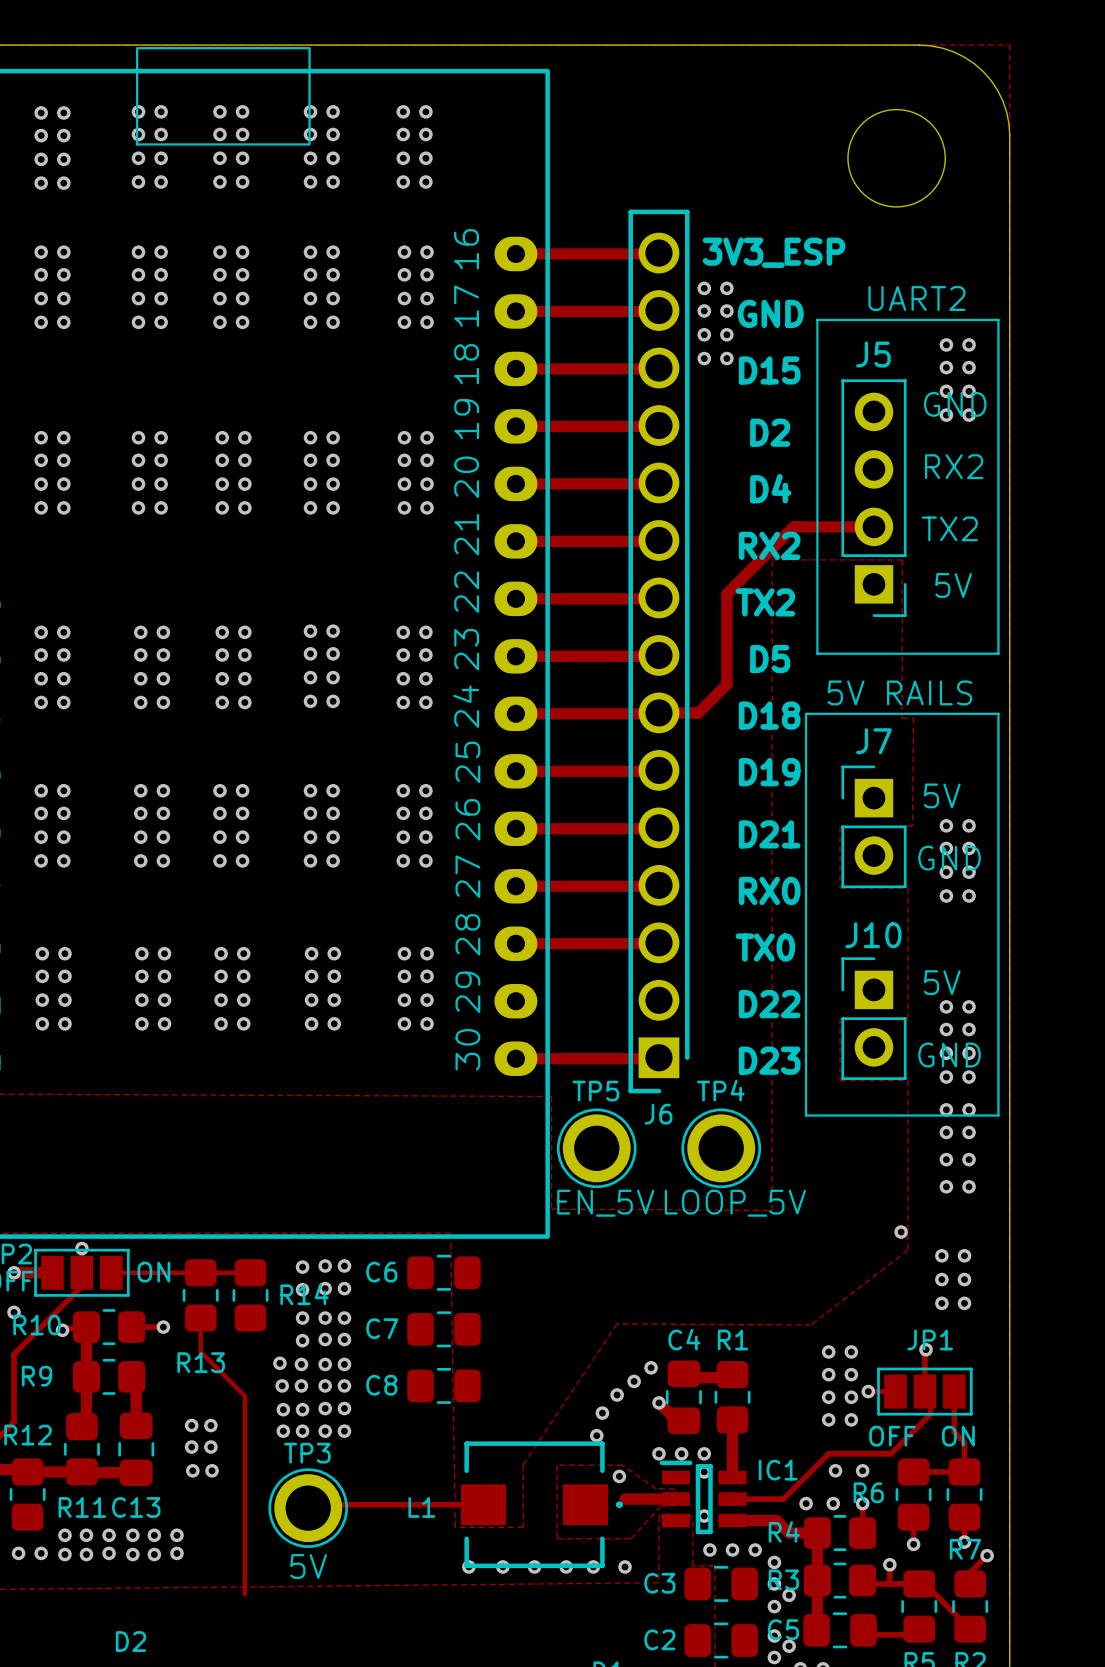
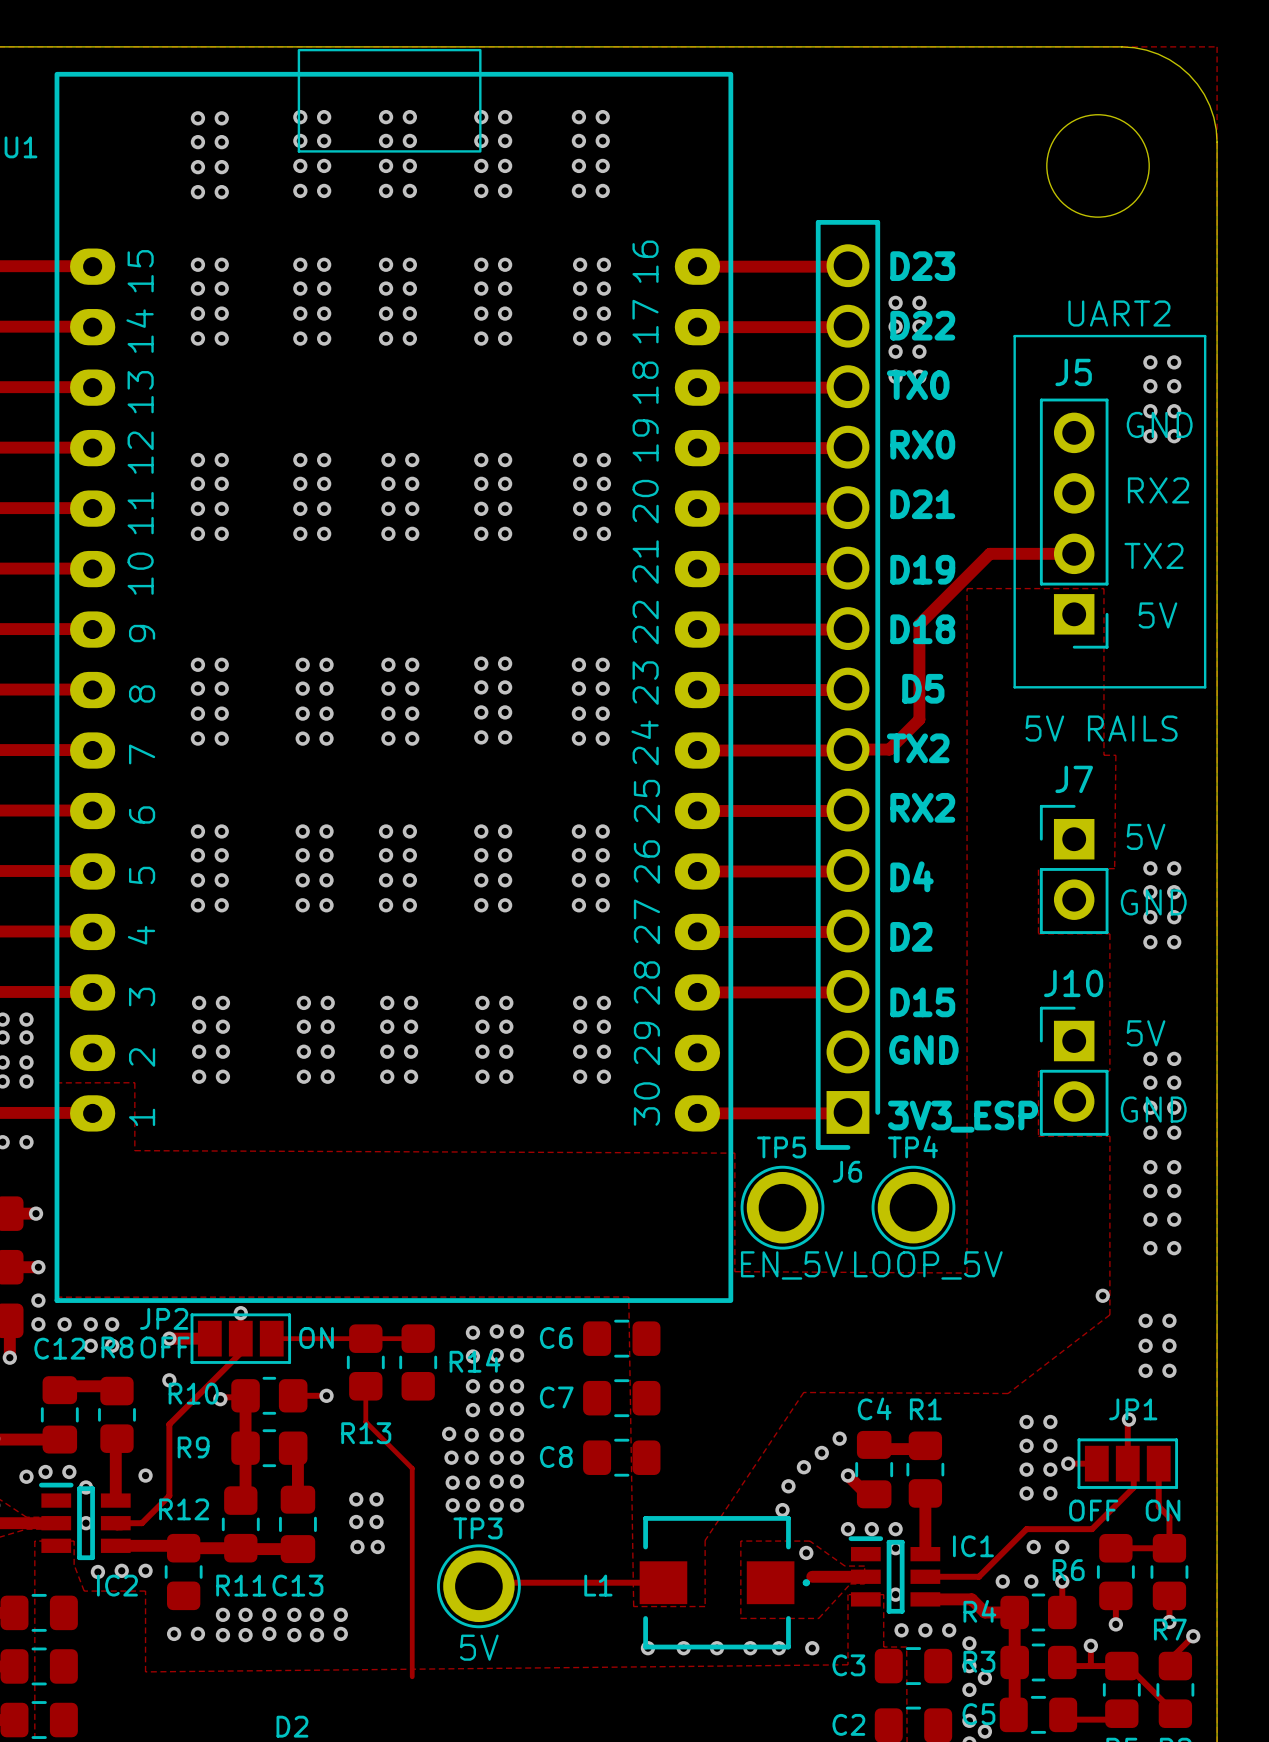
text: 3V3_ESP (773, 252) -> D23 (922, 266)
text: none -> D22 (922, 325)
text: GND (770, 313) -> none
text: none -> TX0 (918, 385)
text: D15 (769, 370) -> none
text position: D2 (770, 432) -> D2 (911, 936)
text position: D4 (770, 488) -> D4 (912, 876)
text position: RX2 (769, 545) -> RX2 (922, 807)
text position: TX2 (765, 602) -> TX2 (918, 748)
text position: D5 (770, 659) -> D5 (923, 688)
line: (806, 713) (998, 713) (998, 1115) (806, 1115) (806, 713) -> none
text position: D18 (769, 715) -> D18 (922, 629)
text position: D19 (769, 772) -> D19 (922, 569)
text position: D21 (769, 834) -> D21 (922, 504)
text position: RX0 (769, 890) -> RX0 (922, 444)
text: TX0 (765, 947) -> none
text: none -> D15 (922, 1002)
text: none -> GND (923, 1050)
text: D22 (769, 1004) -> none
text: D23 (769, 1060) -> none
text: none -> 3V3_ESP (963, 1116)

